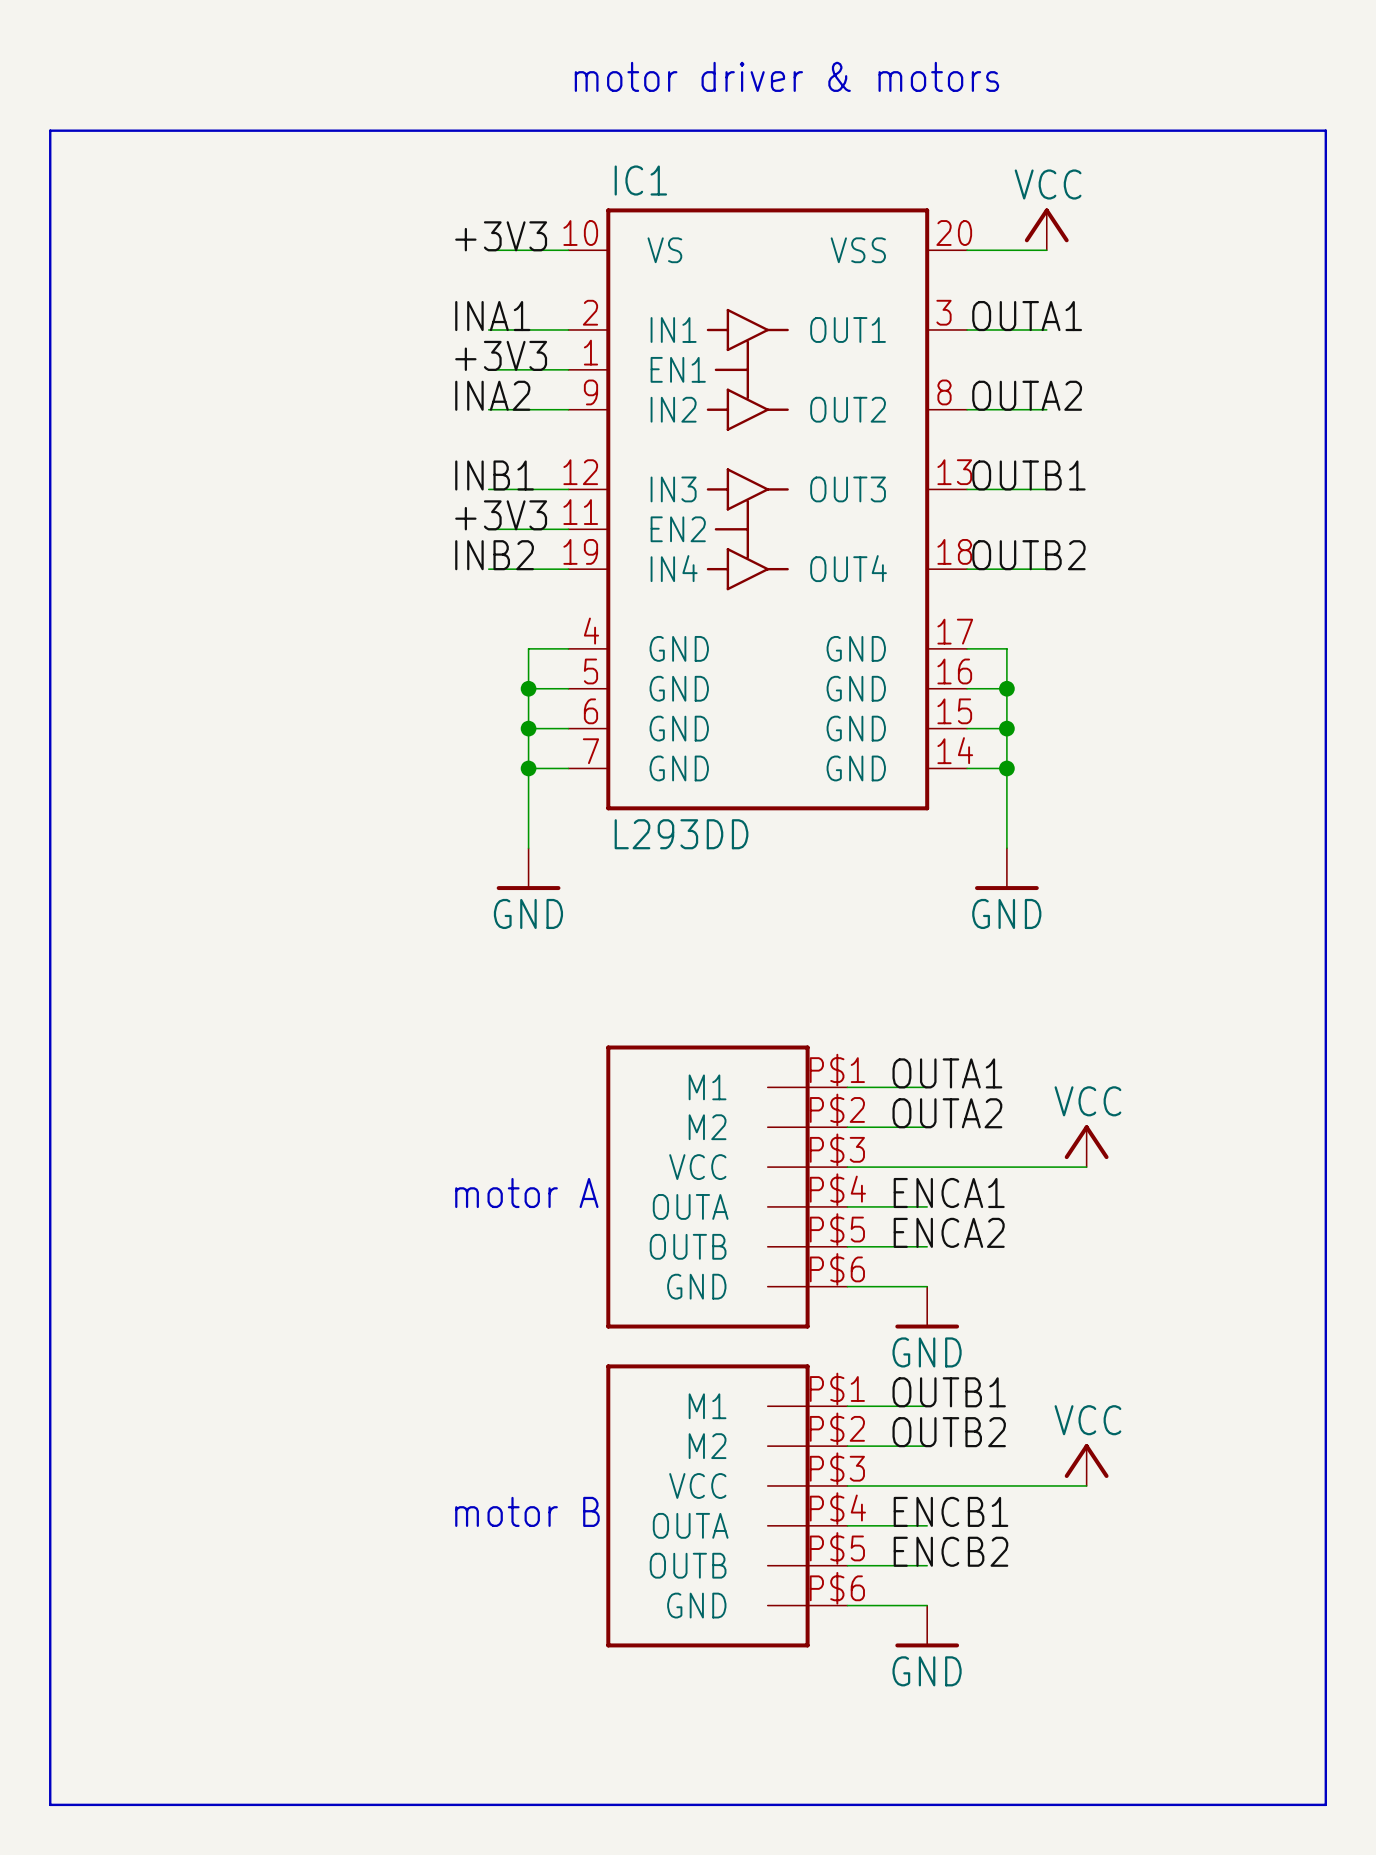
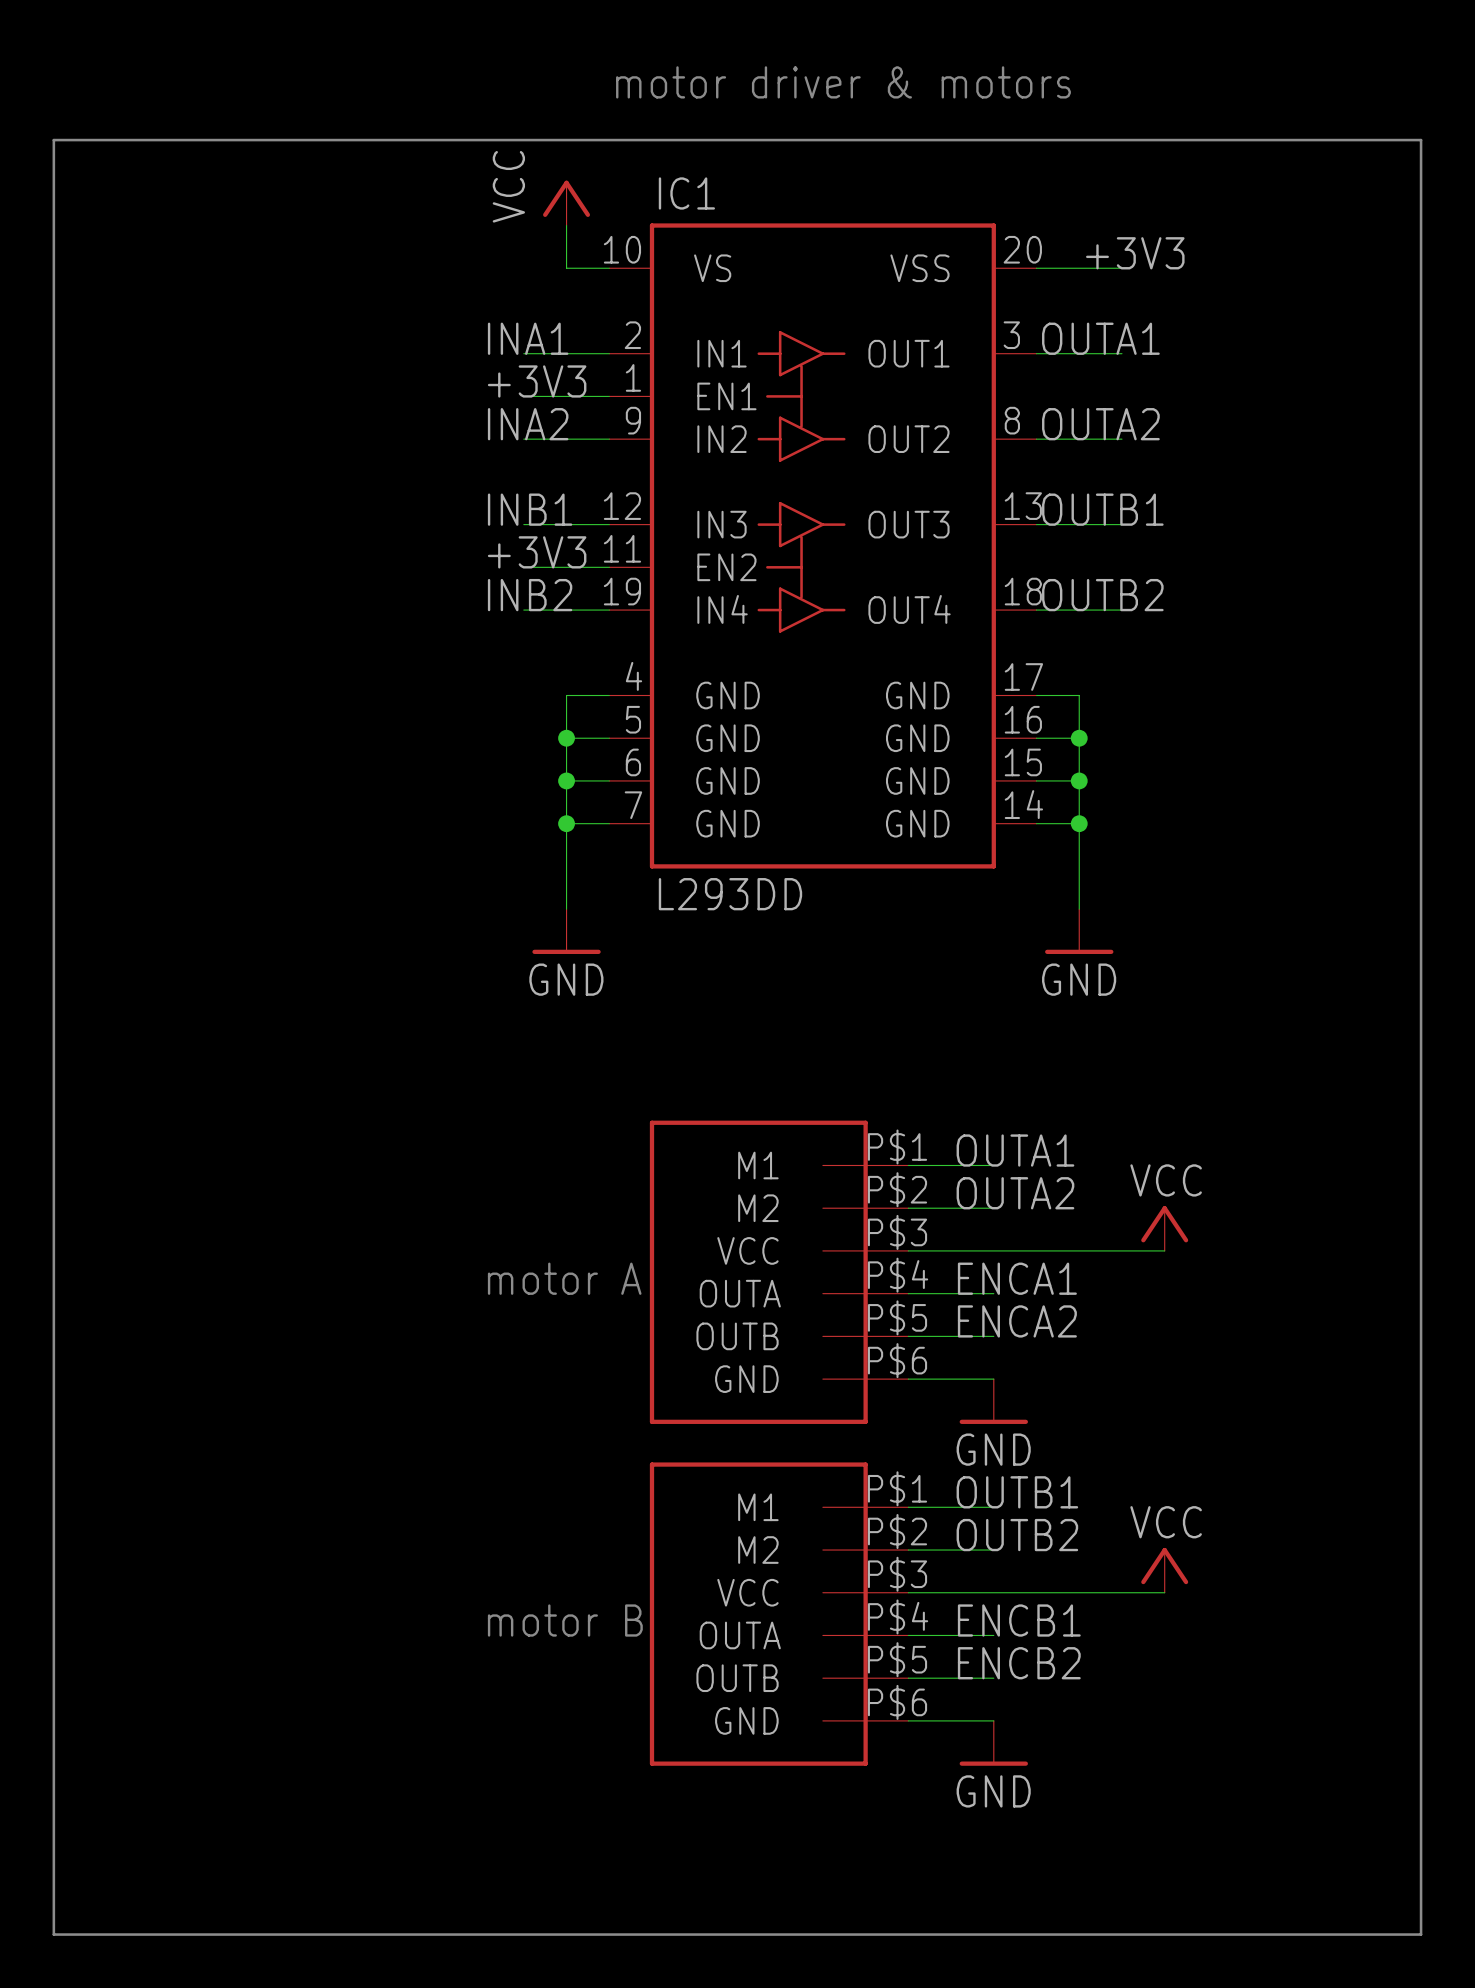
power symbol: none -> VCC (566, 203)
power symbol: VCC (1046, 229) -> none
label: +3V3 (501, 236) -> none
label: none -> +3V3 (1135, 253)
wire: (488, 250) (528, 250) -> (566, 225) (566, 268)

